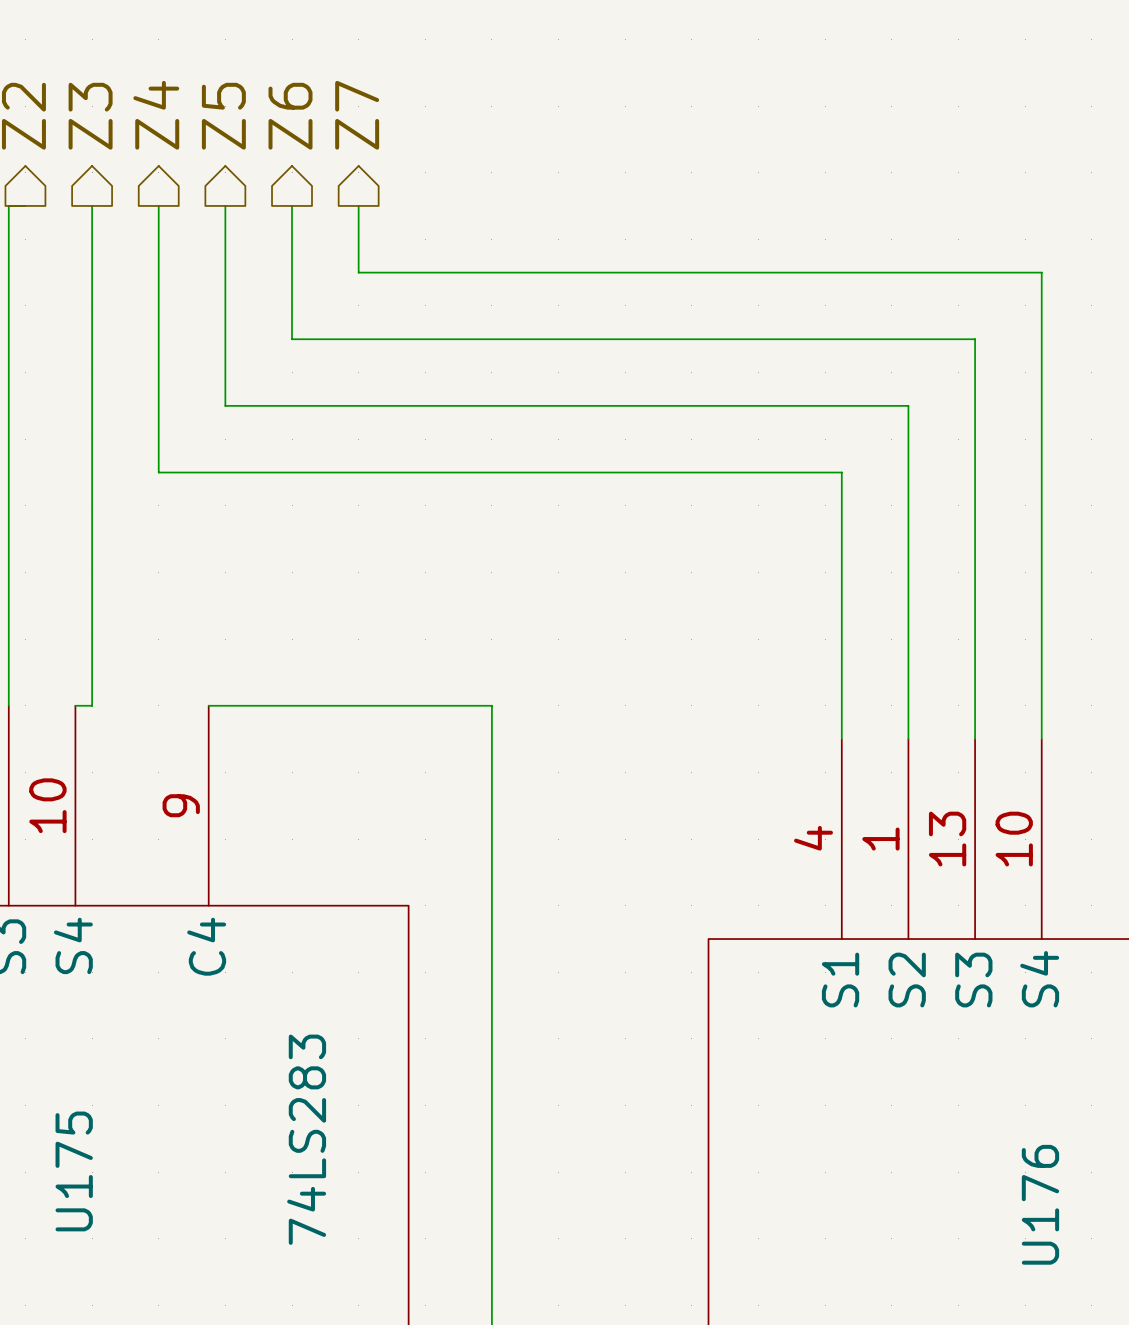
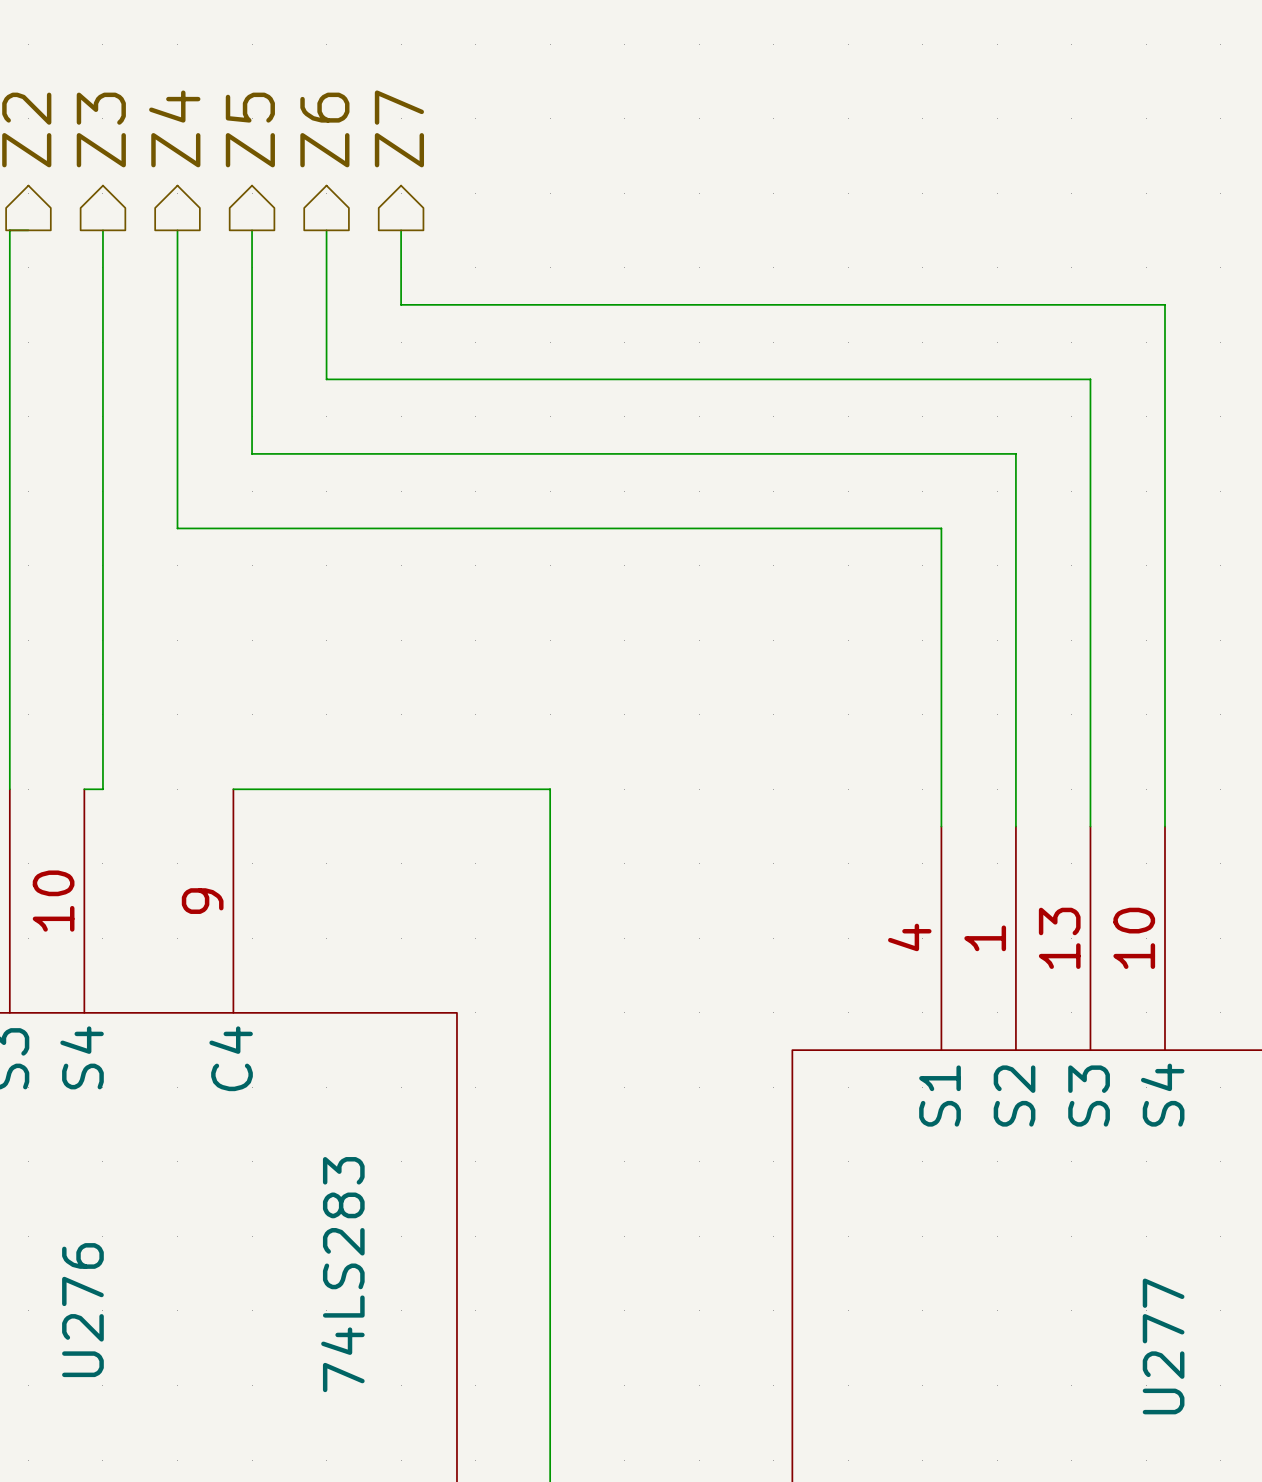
U175 name: U175 (74, 1171) -> U276 (82, 1310)
U176 name: U176 (1040, 1204) -> U277 (1163, 1346)

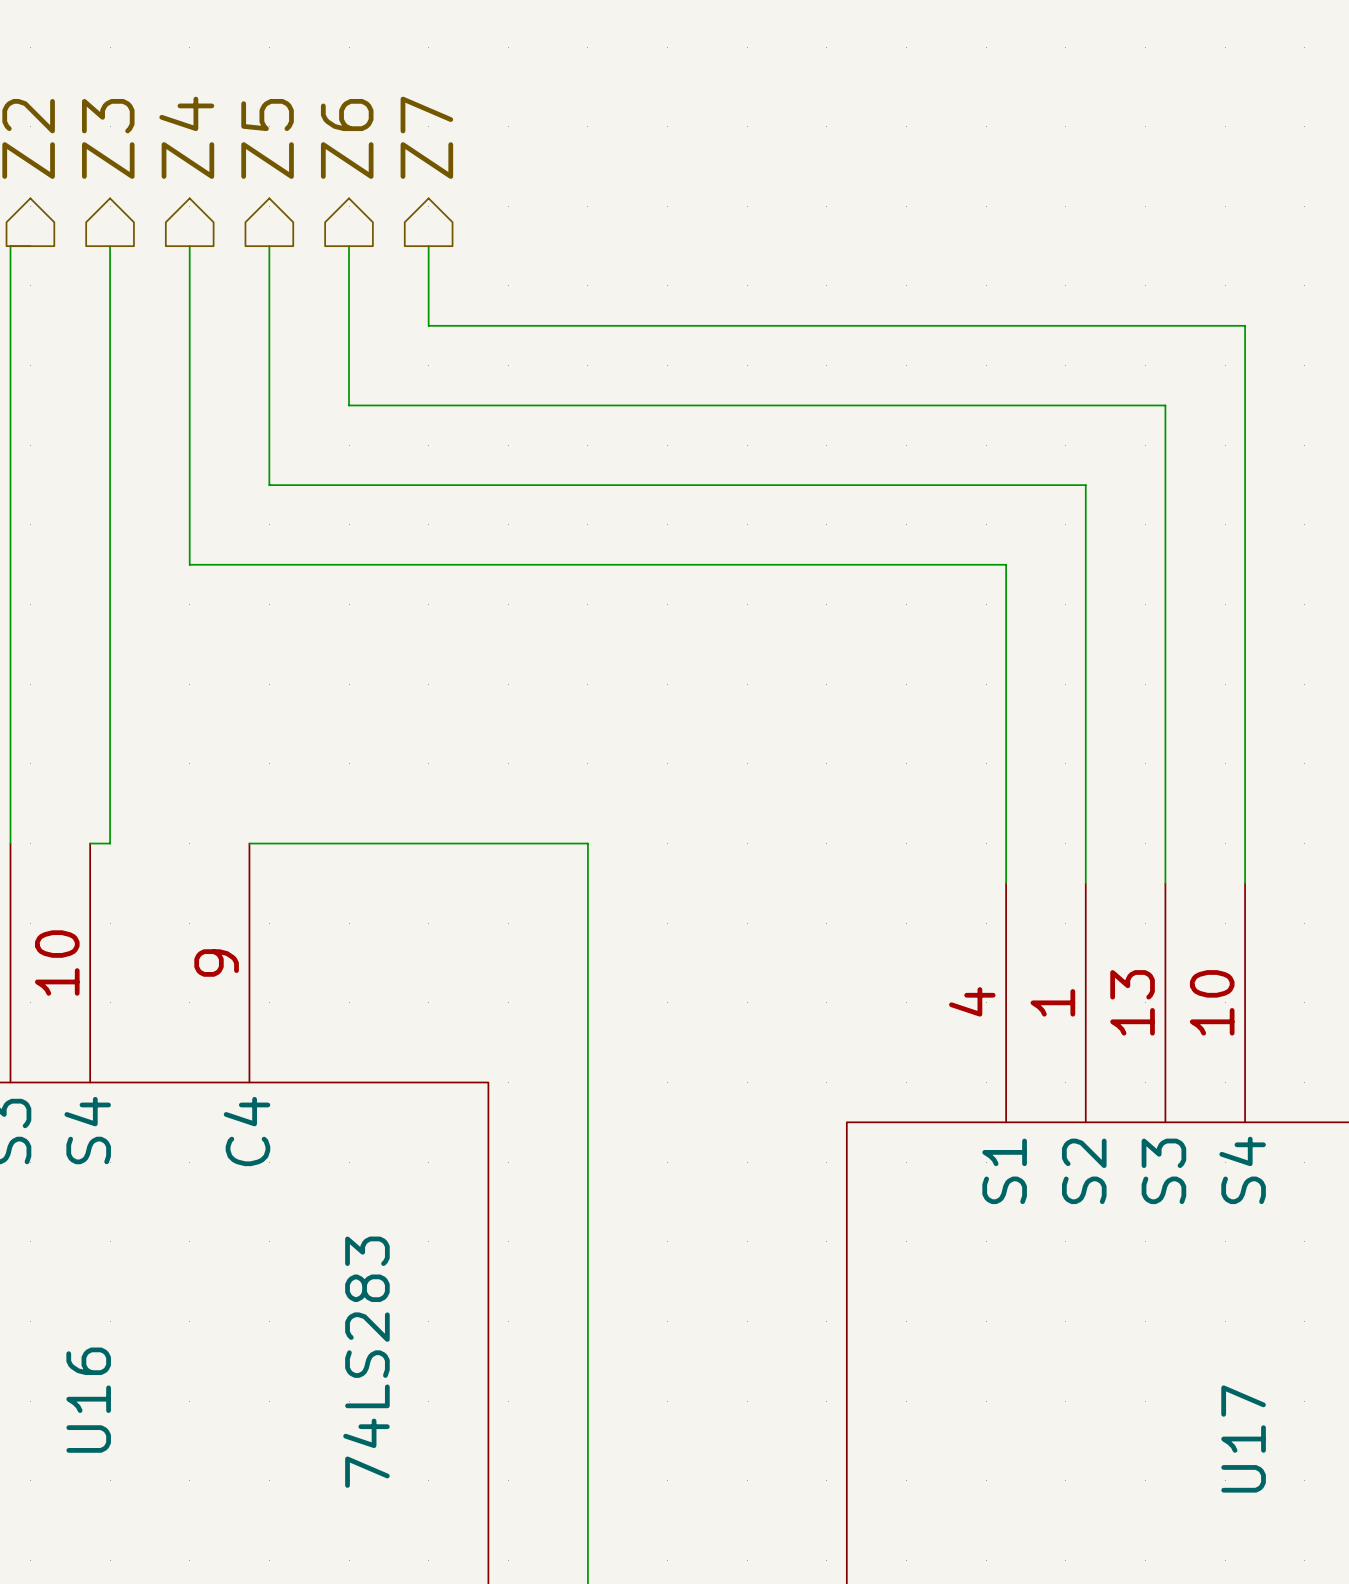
U276 name: U276 (82, 1310) -> U16 (88, 1400)
U277 name: U277 (1163, 1346) -> U17 (1243, 1439)

